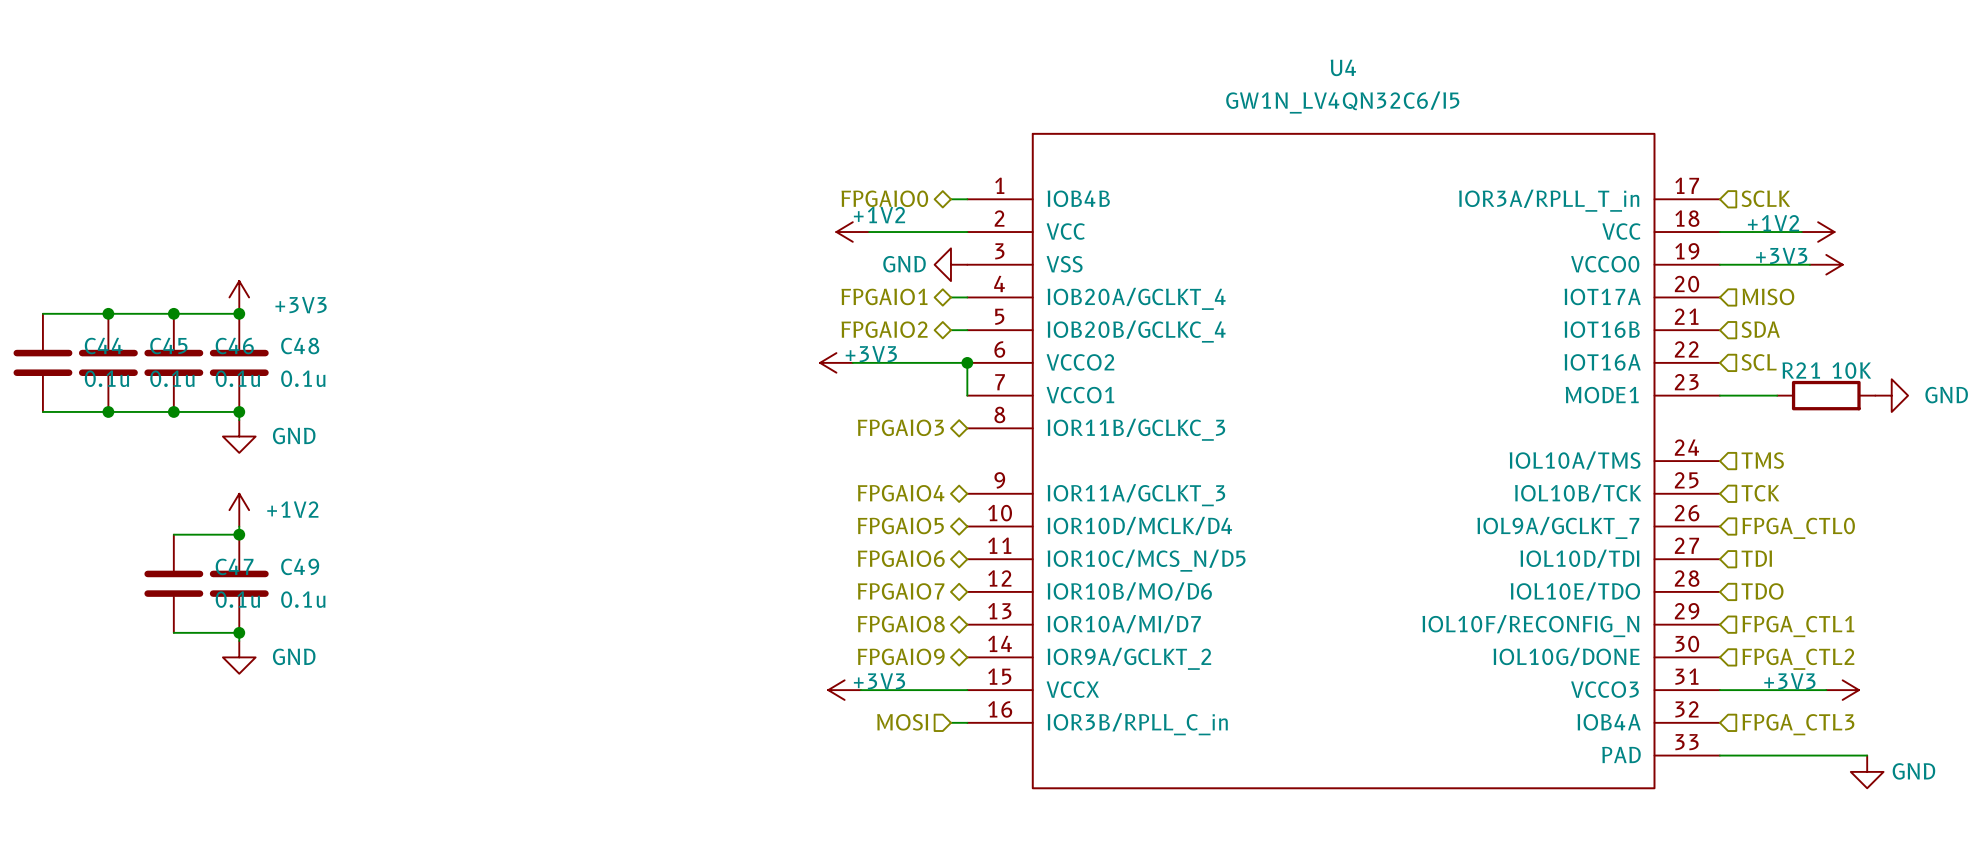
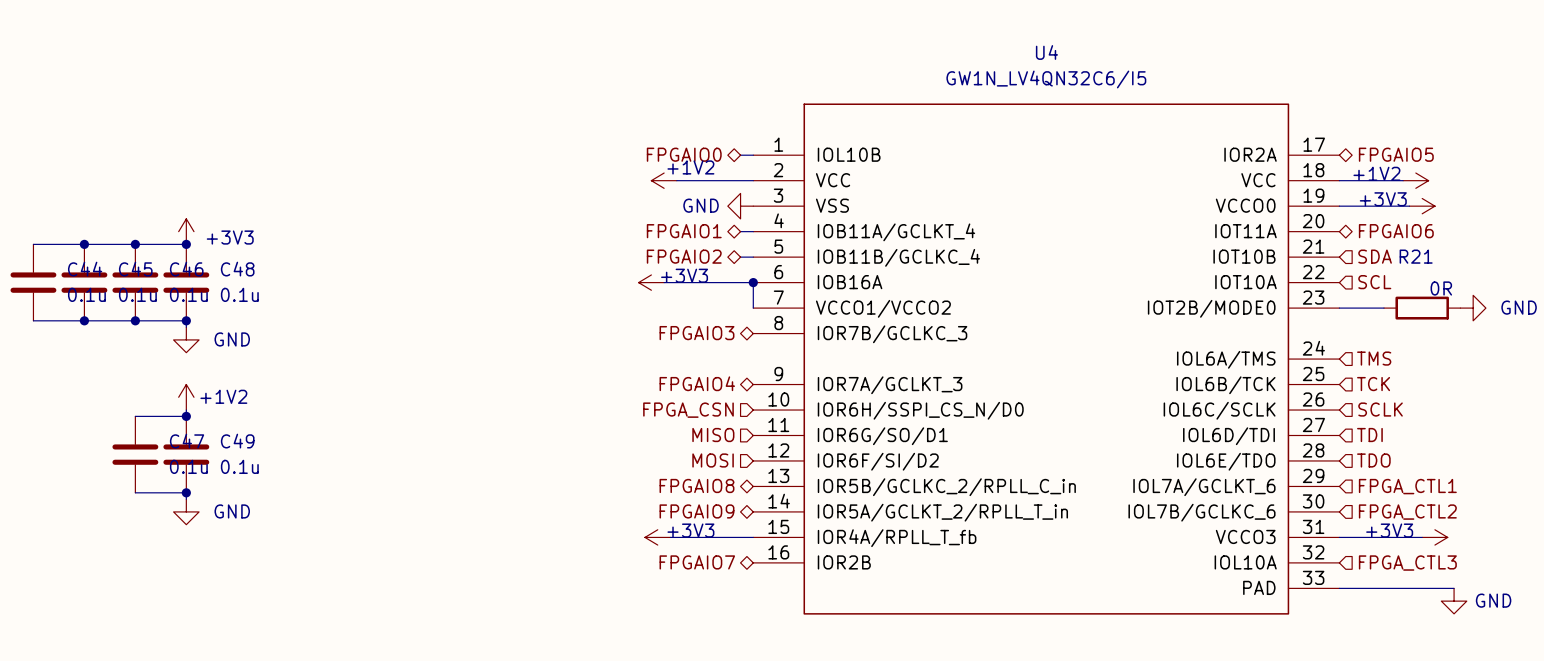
U4 symbol: [967, 132, 1720, 790] -> [753, 103, 1340, 615]
hierarchical label shape: input (1765, 198) -> bidirectional (1396, 154)
hierarchical label: SCLK (1765, 198) -> FPGAIO5 (1396, 154)
hierarchical label shape: input (1768, 296) -> bidirectional (1396, 231)
hierarchical label: MISO (1768, 296) -> FPGAIO6 (1396, 231)
R21 name position: R21 (1801, 370) -> R21 (1416, 256)
R21 value: 10K (1851, 370) -> 0R (1441, 288)
hierarchical label shape: bidirectional (900, 525) -> input (688, 410)
hierarchical label: FPGAIO5 (900, 525) -> FPGA_CSN (688, 410)
hierarchical label: FPGA_CTL0 (1798, 528) -> SCLK (1380, 409)
hierarchical label shape: bidirectional (901, 558) -> input (713, 435)
hierarchical label: FPGAIO6 (901, 558) -> MISO (713, 435)
hierarchical label shape: bidirectional (901, 591) -> input (713, 460)
hierarchical label: FPGAIO7 (901, 591) -> MOSI (713, 460)
hierarchical label: none -> FPGAIO7 (697, 562)
hierarchical label: MOSI (902, 722) -> none
wire: (950, 722) (967, 722) -> none

